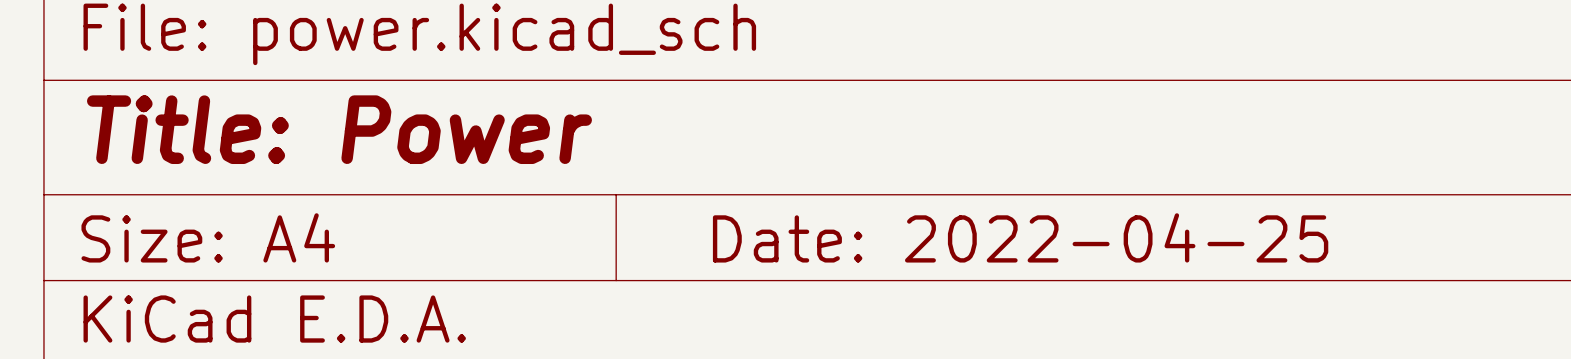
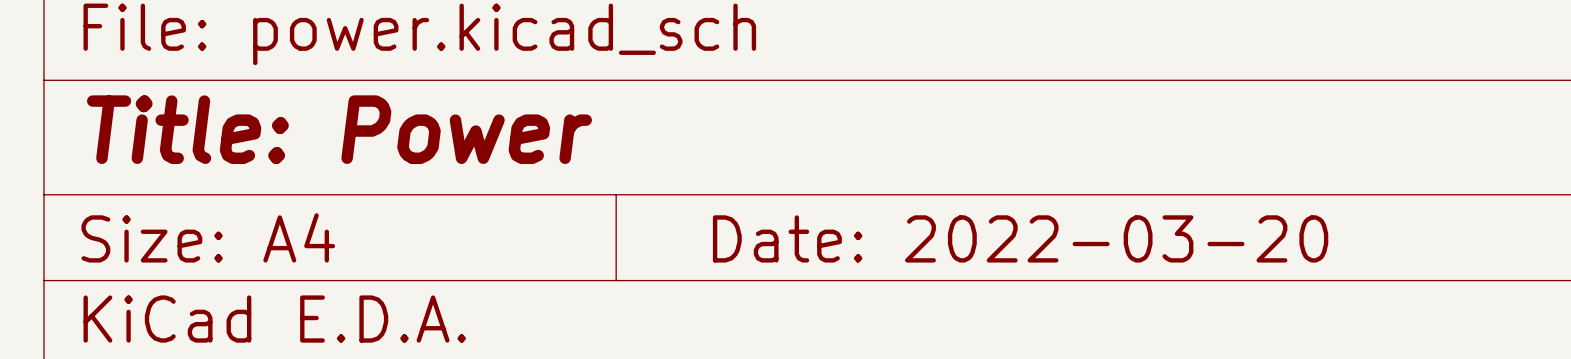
title block: Date: 2022-04-25 (1020, 237) -> Date: 2022-03-20 (1020, 238)

